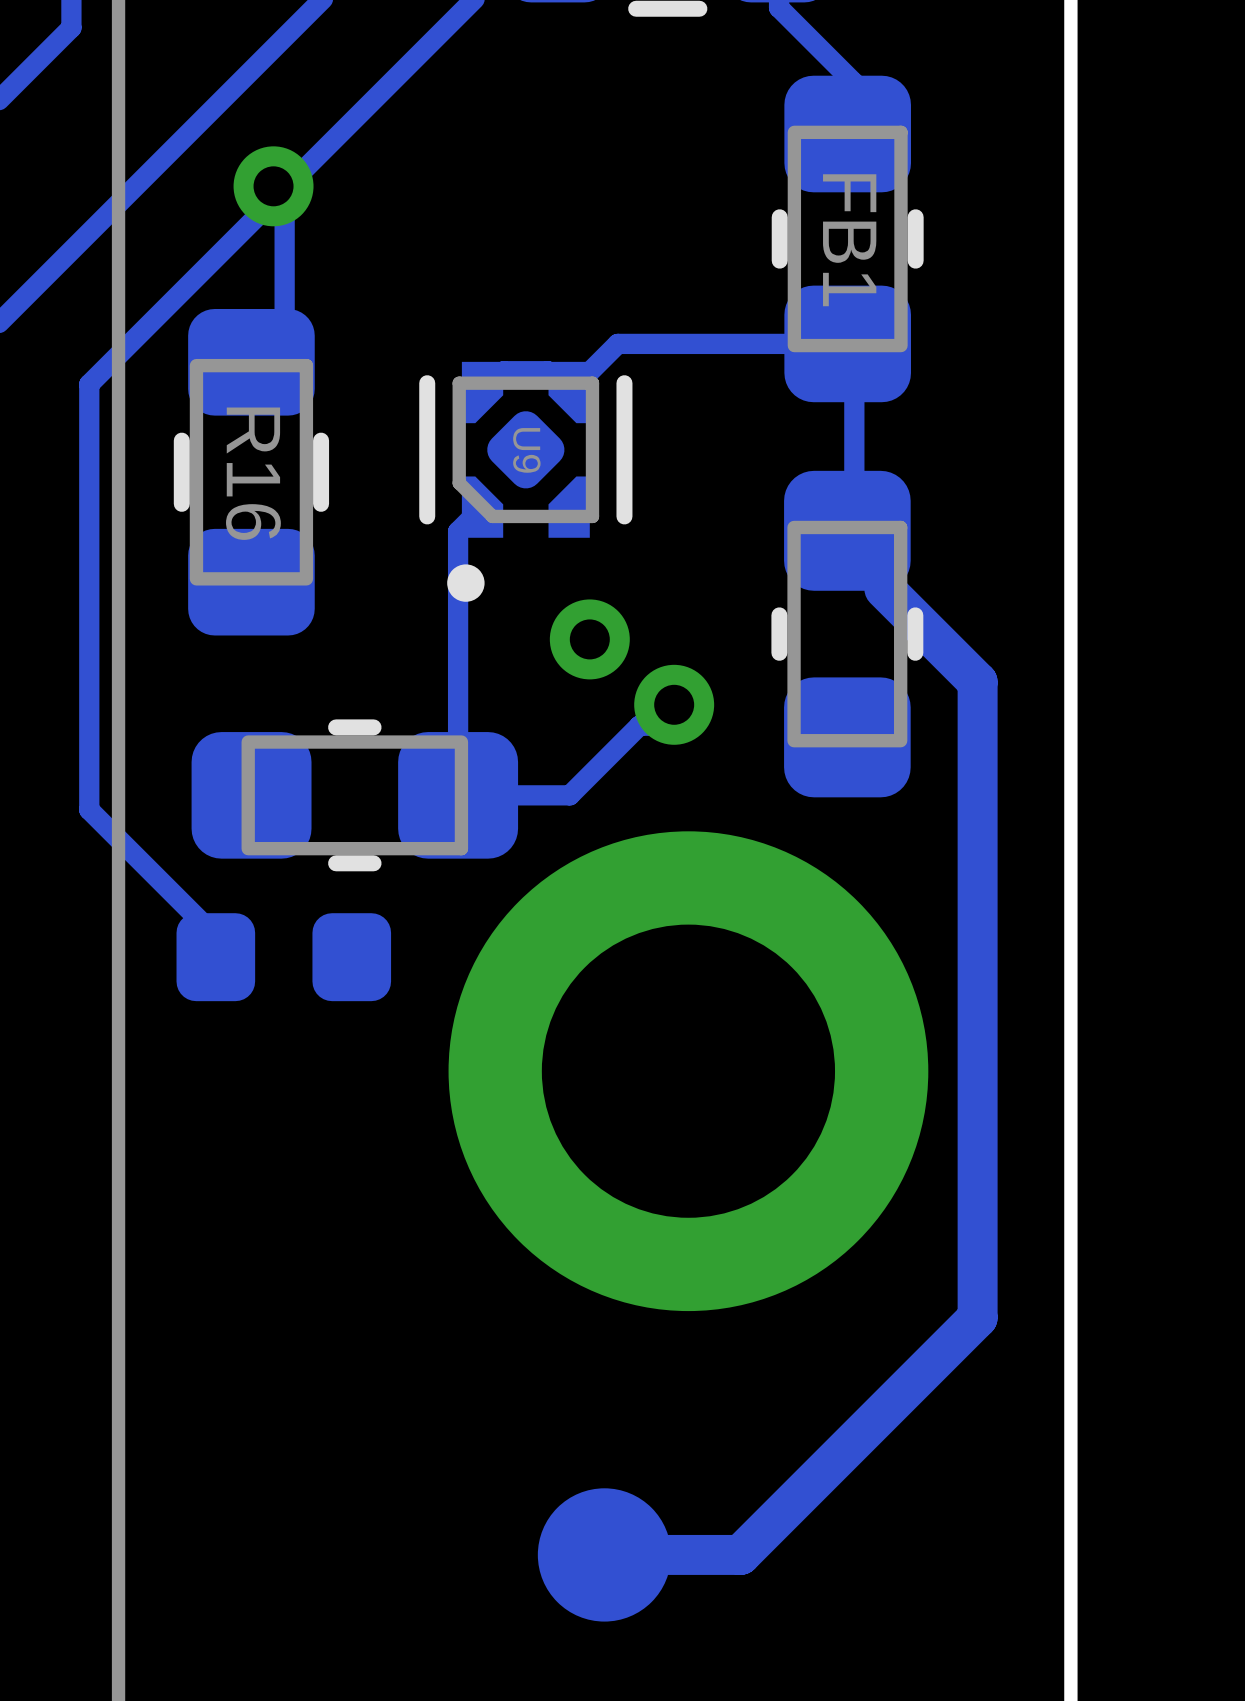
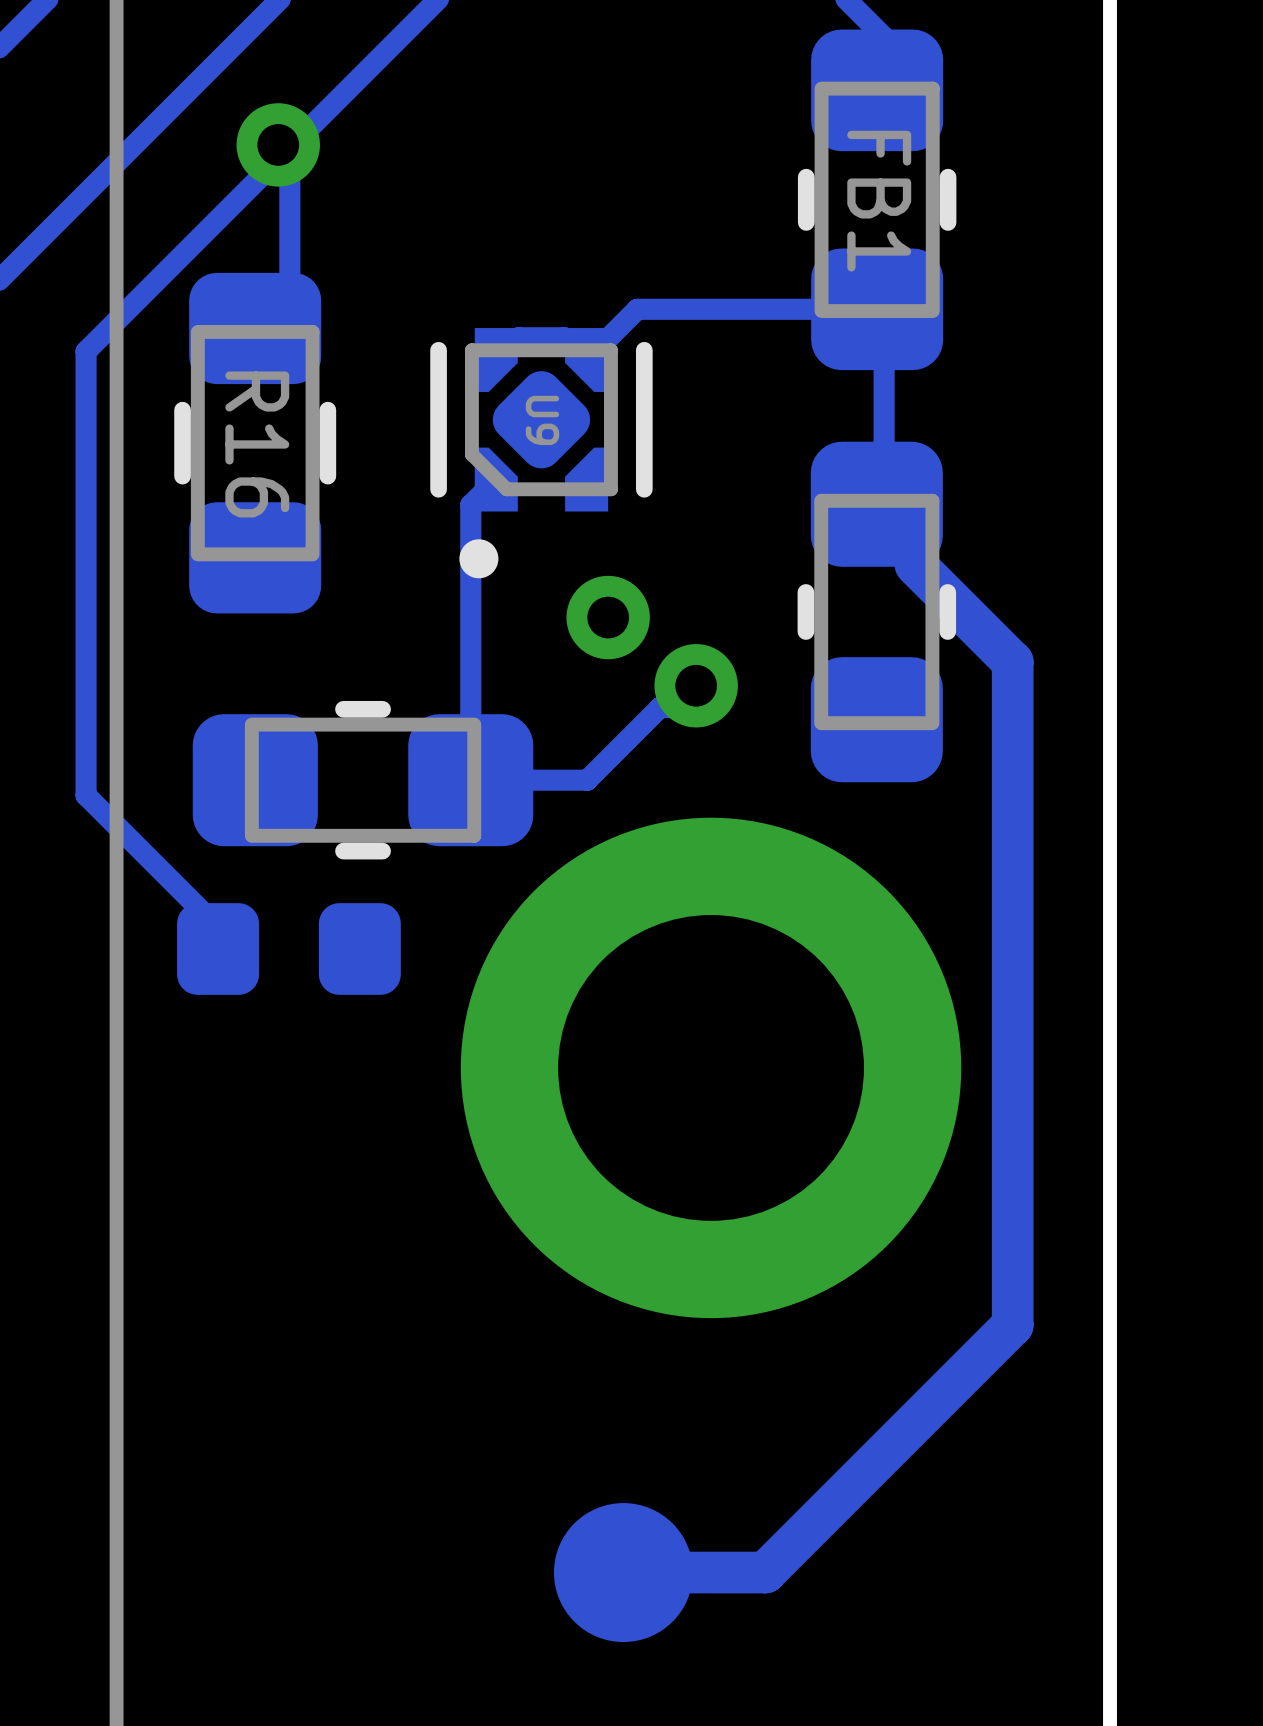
U9 footprint: [419, 361, 633, 602] -> [430, 328, 653, 579]

